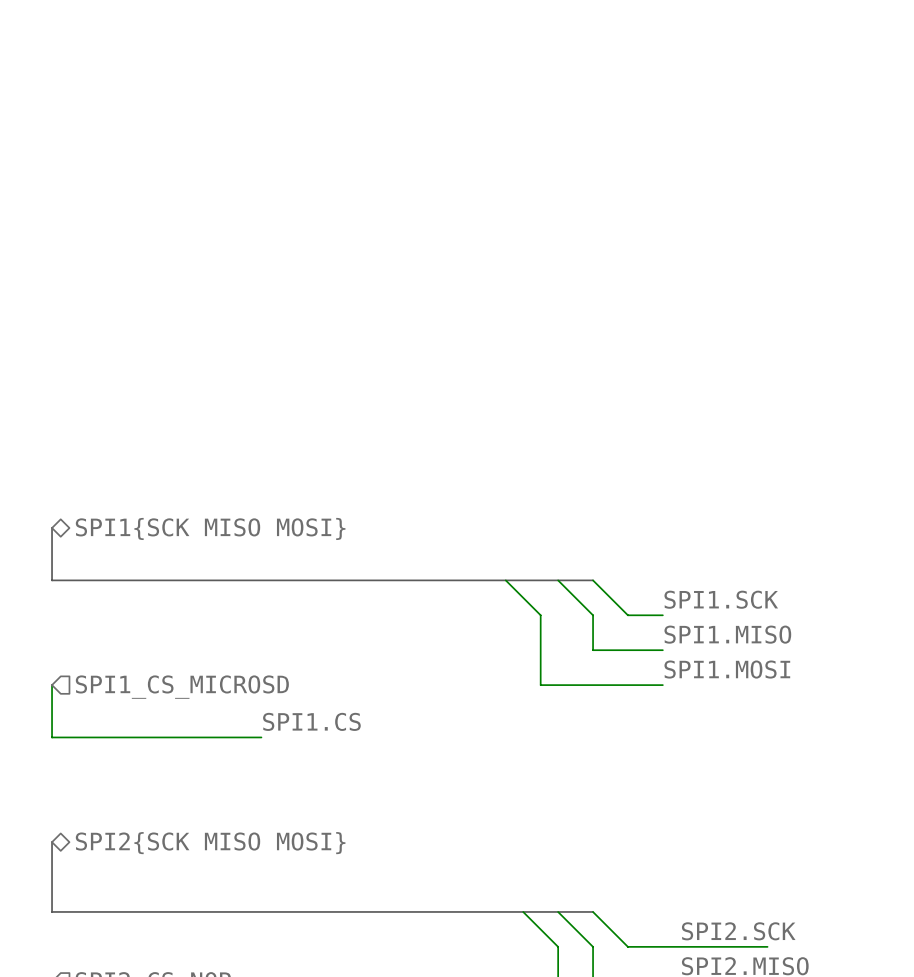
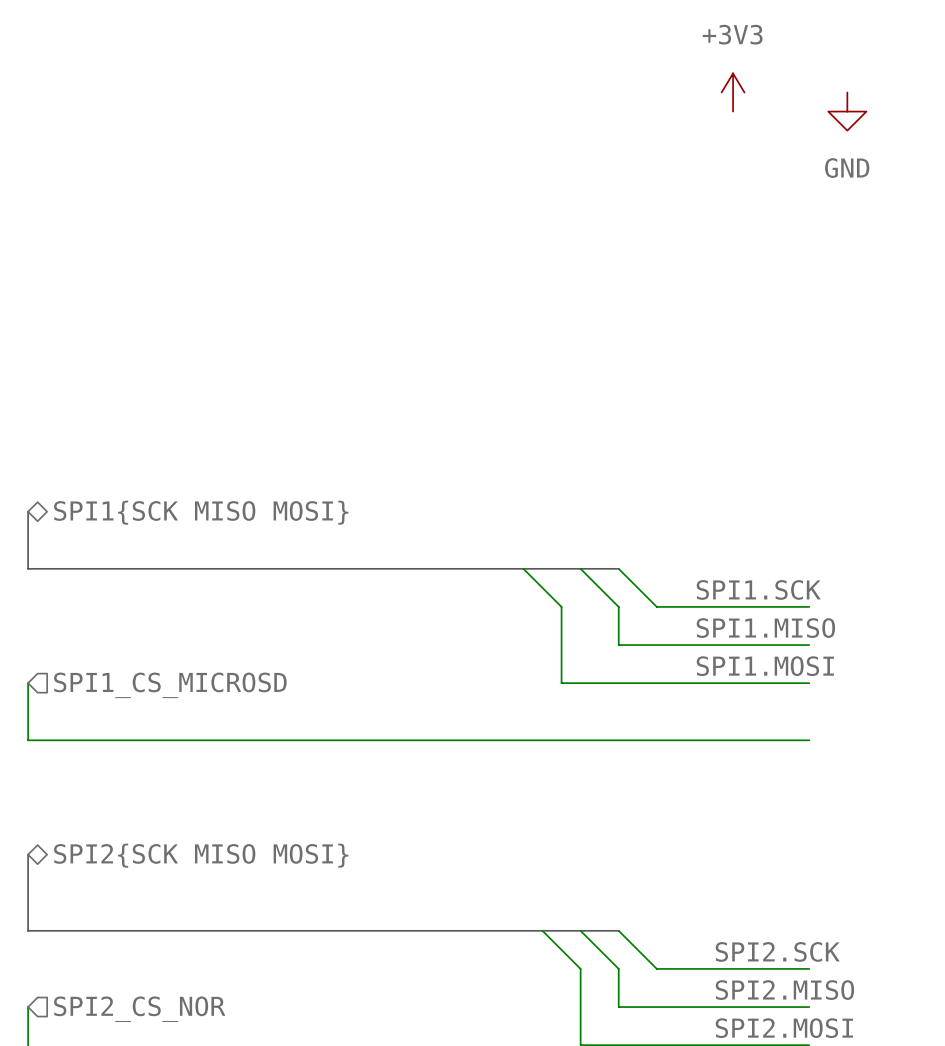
power symbol: none -> +3V3 (733, 92)
power symbol: none -> GND (847, 111)
wire: none -> (694, 606) (809, 606)
wire: none -> (694, 645) (809, 645)
wire: none -> (694, 683) (809, 683)
label: SPI1.CS (311, 721) -> none
wire: none -> (256, 740) (809, 740)

